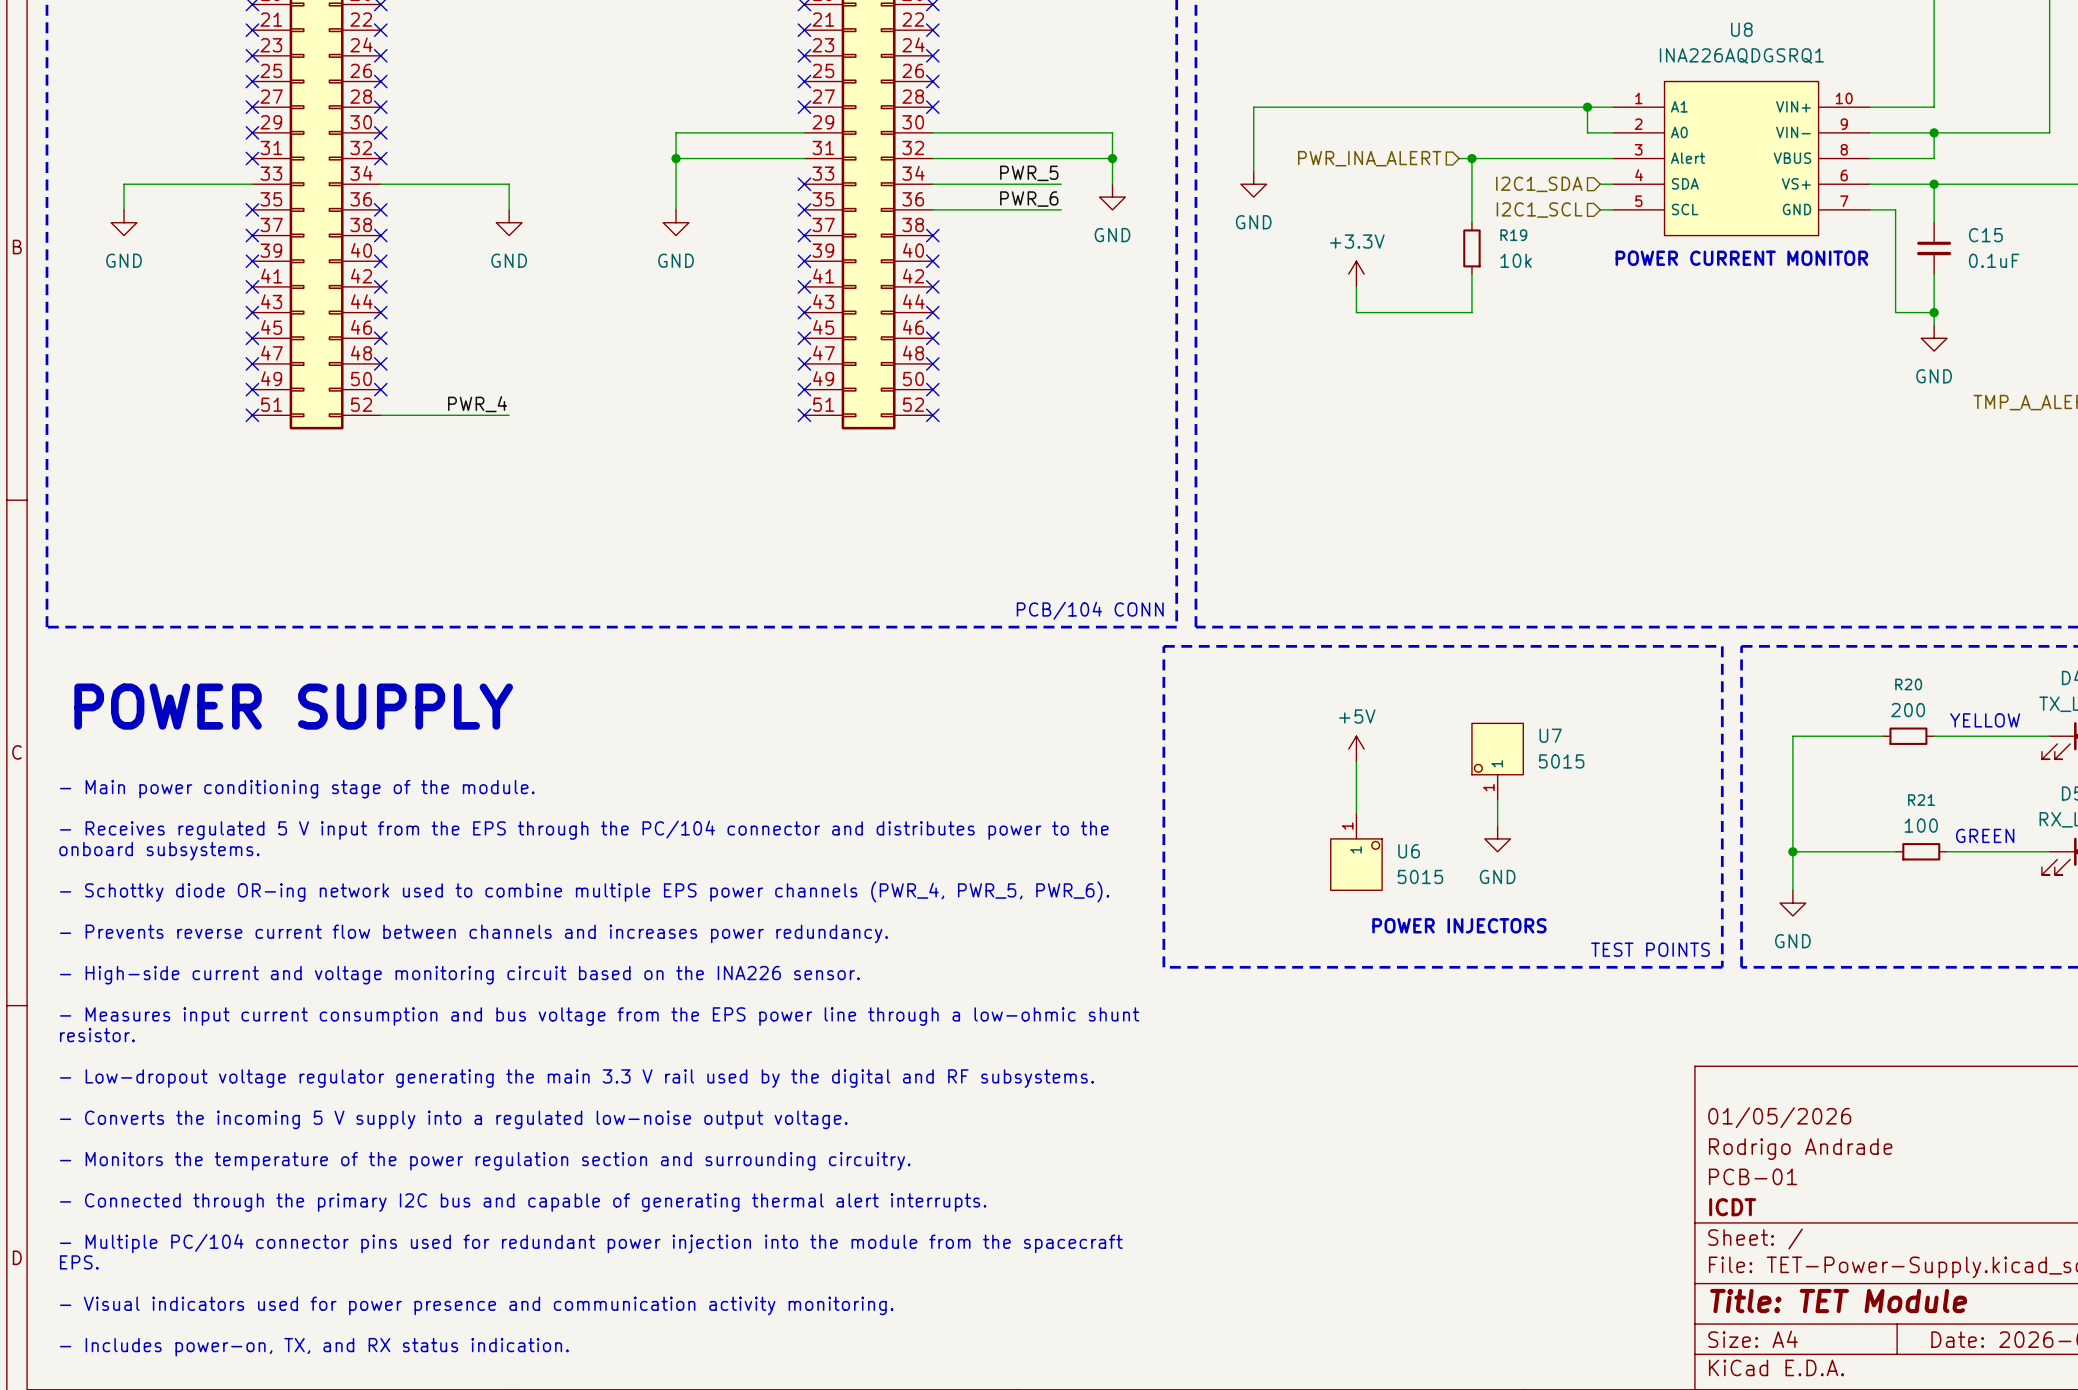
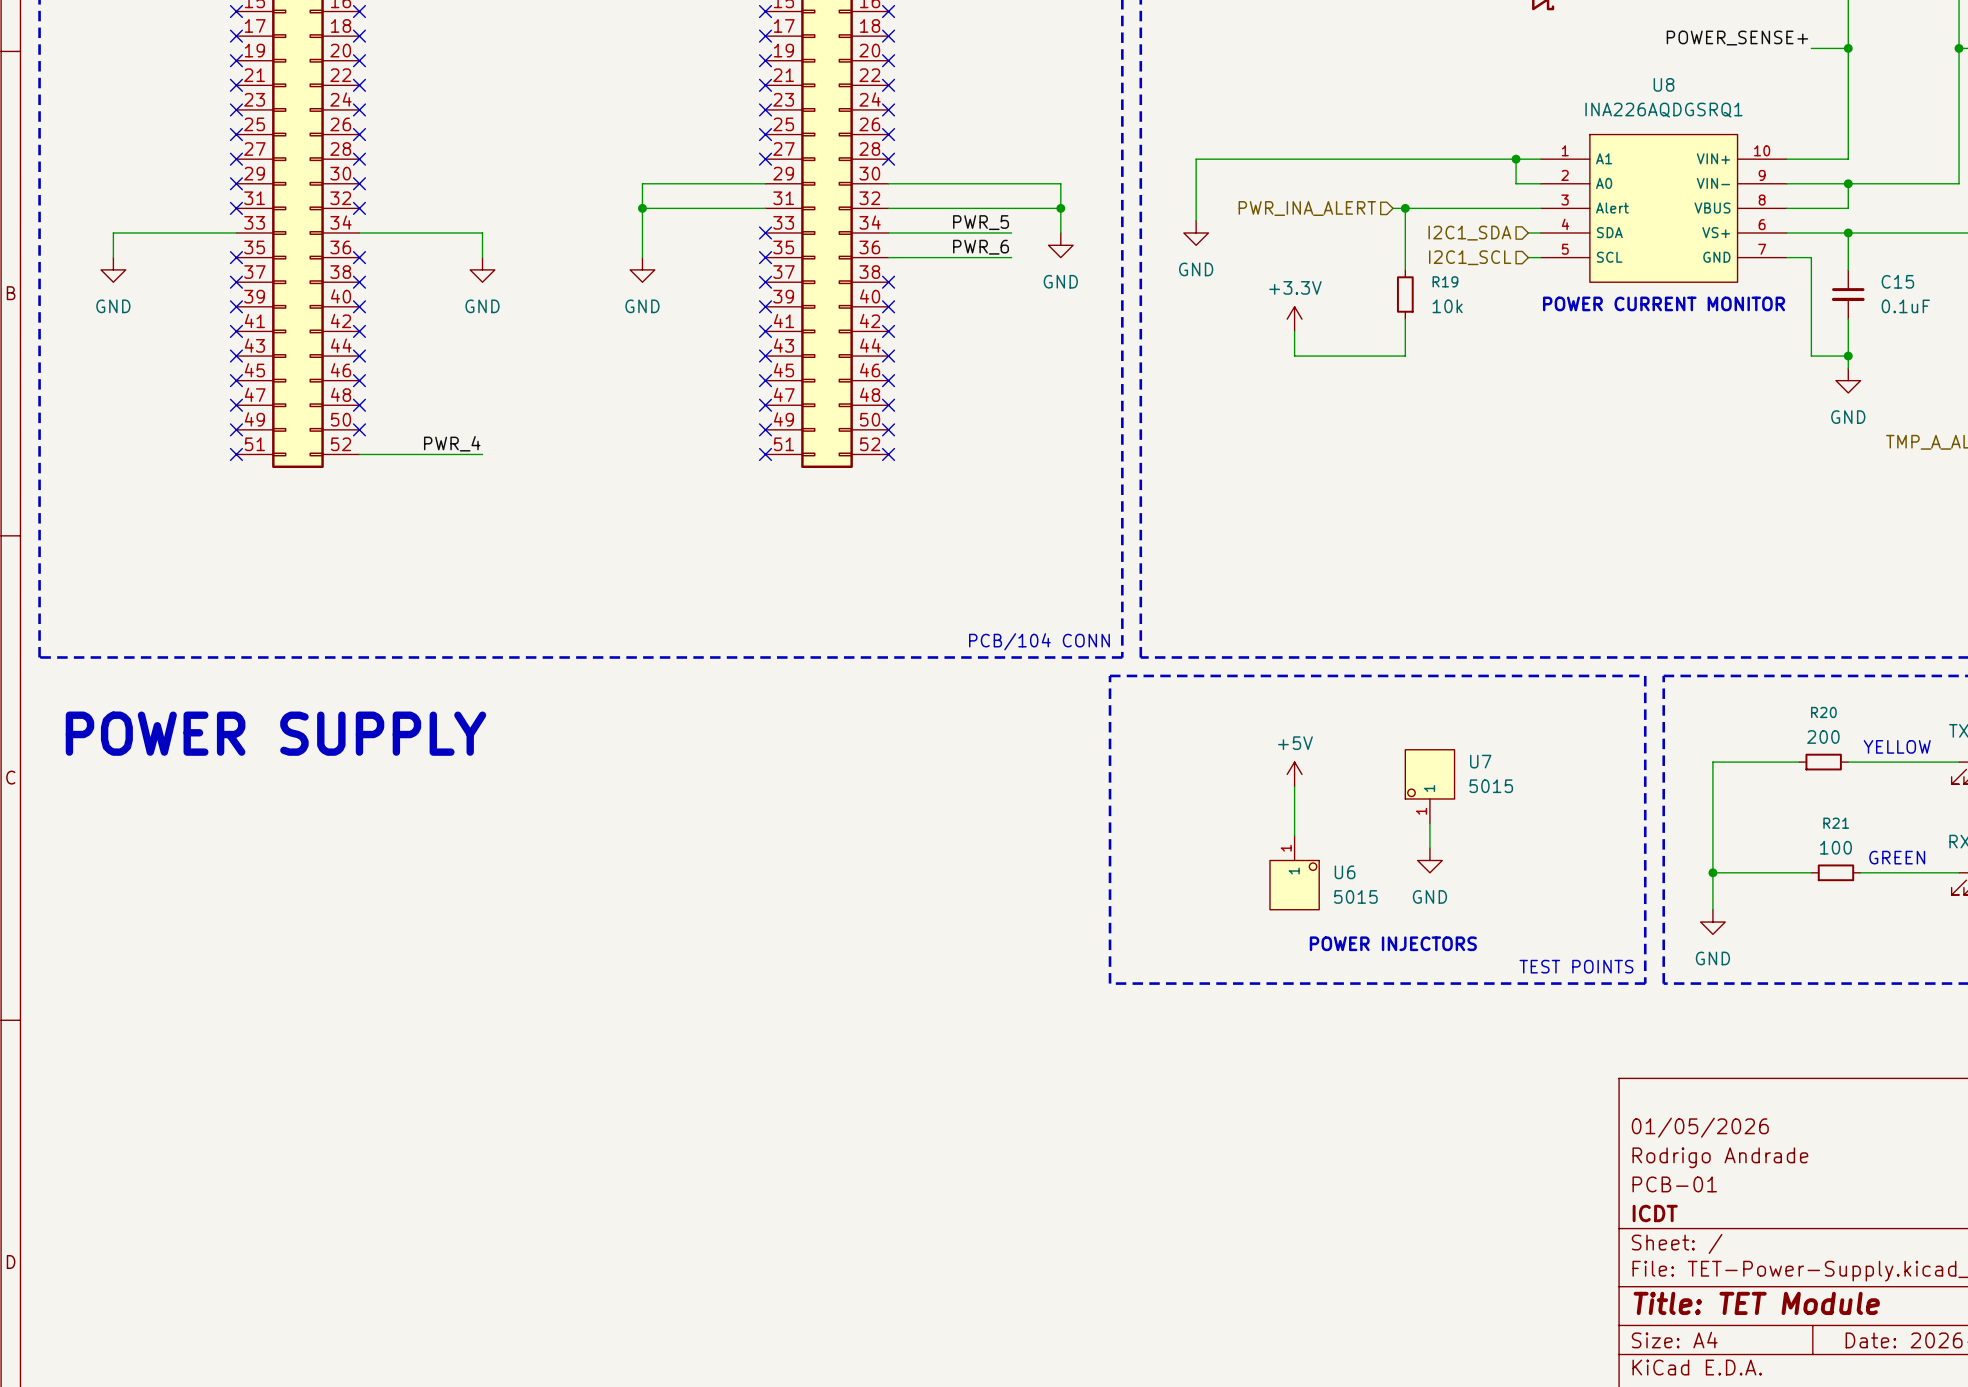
text: - Main power conditioning stage of the module. (297, 789) -> none
text: - Receives regulated 5 V input from the EPS through the PC/104 connector and distributes power to the (584, 830) -> none
text: onboard subsystems. (159, 851) -> none
text: - Schottky diode OR-ing network used to combine multiple EPS power channels (PWR_4, PWR_5, PWR_6). (584, 891) -> none
text: - Prevents reverse current flow between channels and increases power redundancy. (473, 933) -> none
text: - High-side current and voltage monitoring circuit based on the INA226 sensor. (459, 975) -> none
text: - Measures input current consumption and bus voltage from the EPS power line through a low-ohmic shunt (599, 1016) -> none
text: resistor. (97, 1035) -> none
text: - Low-dropout voltage regulator generating the main 3.3 V rail used by the digital and RF subsystems. (576, 1078) -> none
text: - Converts the incoming 5 V supply into a regulated low-noise output voltage. (453, 1119) -> none
text: - Monitors the temperature of the power regulation section and surrounding circuitry. (485, 1161) -> none
text: - Connected through the primary I2C bus and capable of generating thermal alert interrupts. (523, 1202) -> none
text: - Multiple PC/104 connector pins used for redundant power injection into the module from the spacecraft (591, 1243) -> none
text: EPS. (79, 1262) -> none
text: - Visual indicators used for power presence and communication activity monitoring. (476, 1305) -> none
text: - Includes power-on, TX, and RX status indication. (314, 1347) -> none

